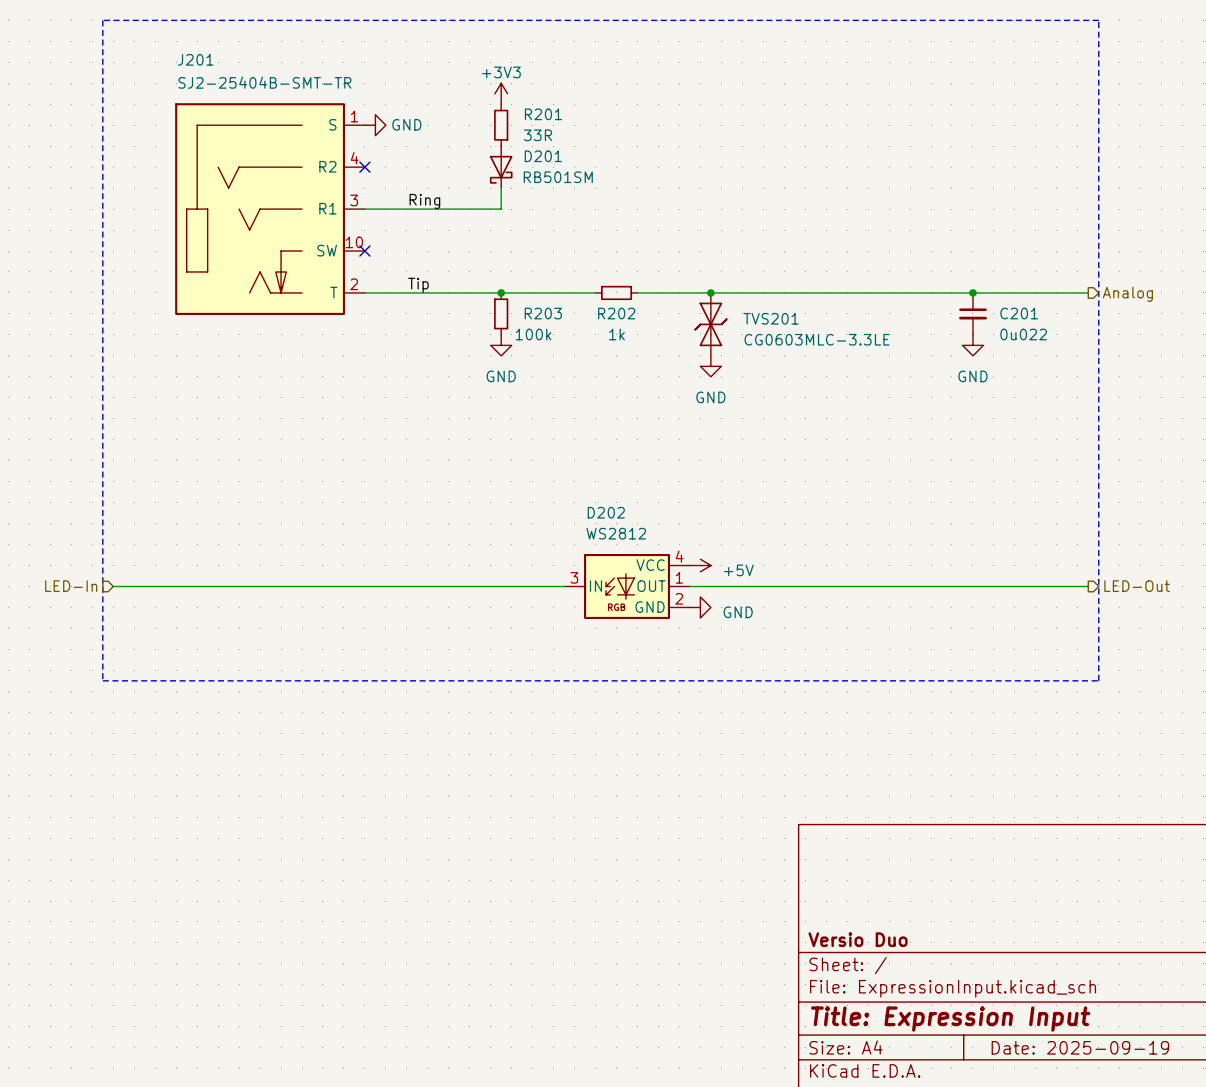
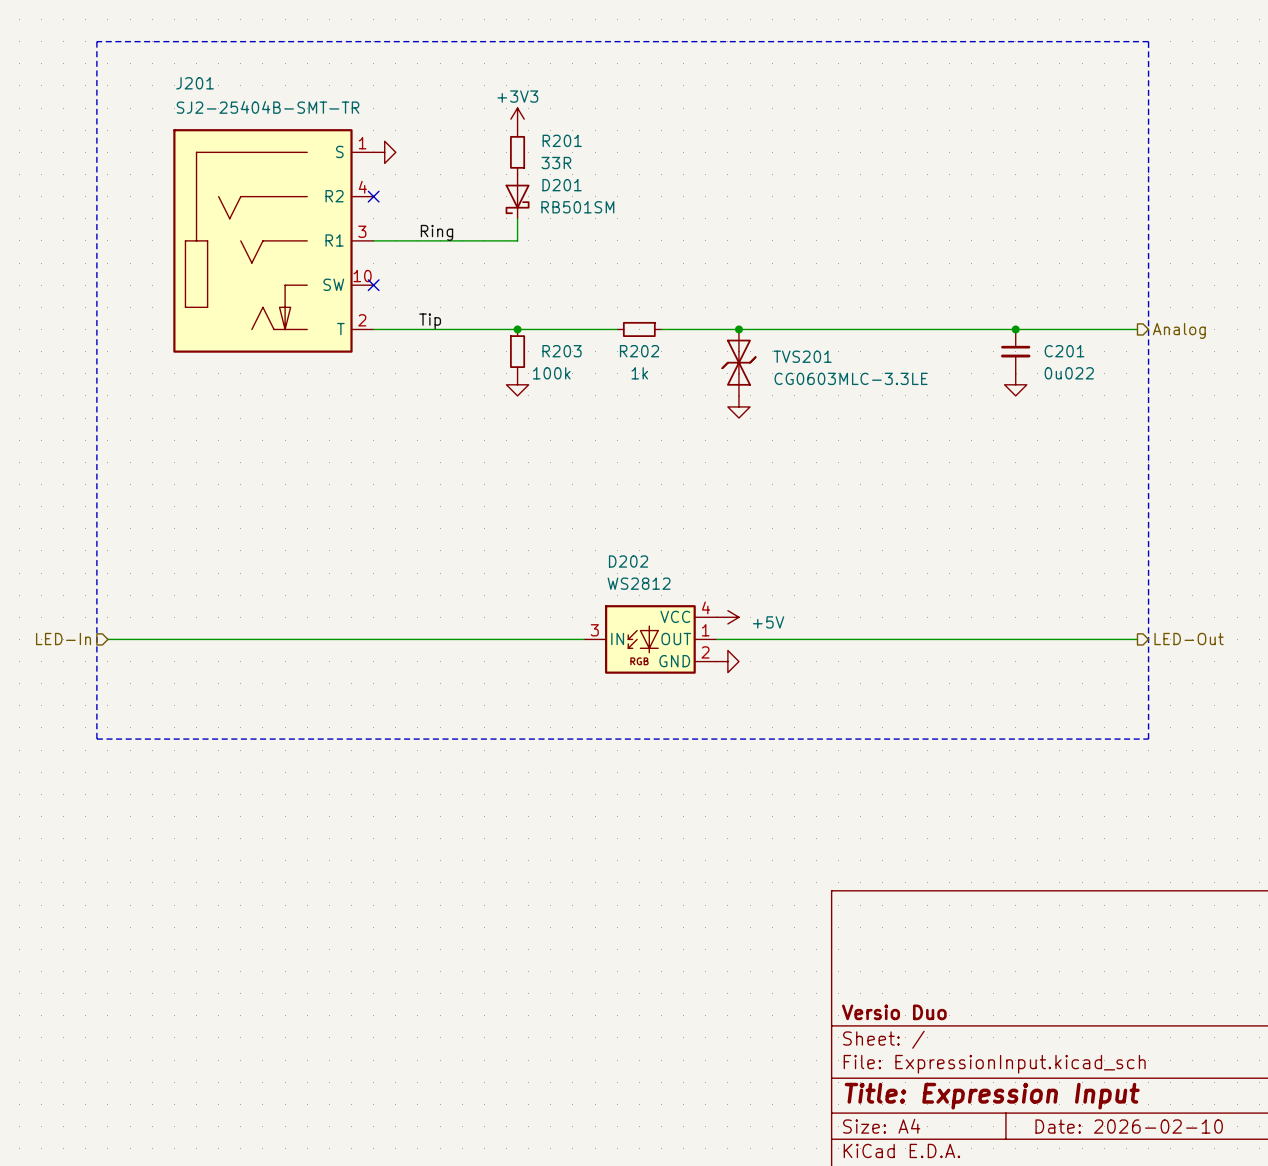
power symbol text: GND (406, 124) -> none
power symbol text: GND (501, 376) -> none
power symbol text: GND (972, 376) -> none
power symbol text: GND (710, 397) -> none
power symbol text: GND (738, 612) -> none
title block: Date: 2025-09-19 (1080, 1047) -> Date: 2026-02-10 (1129, 1126)

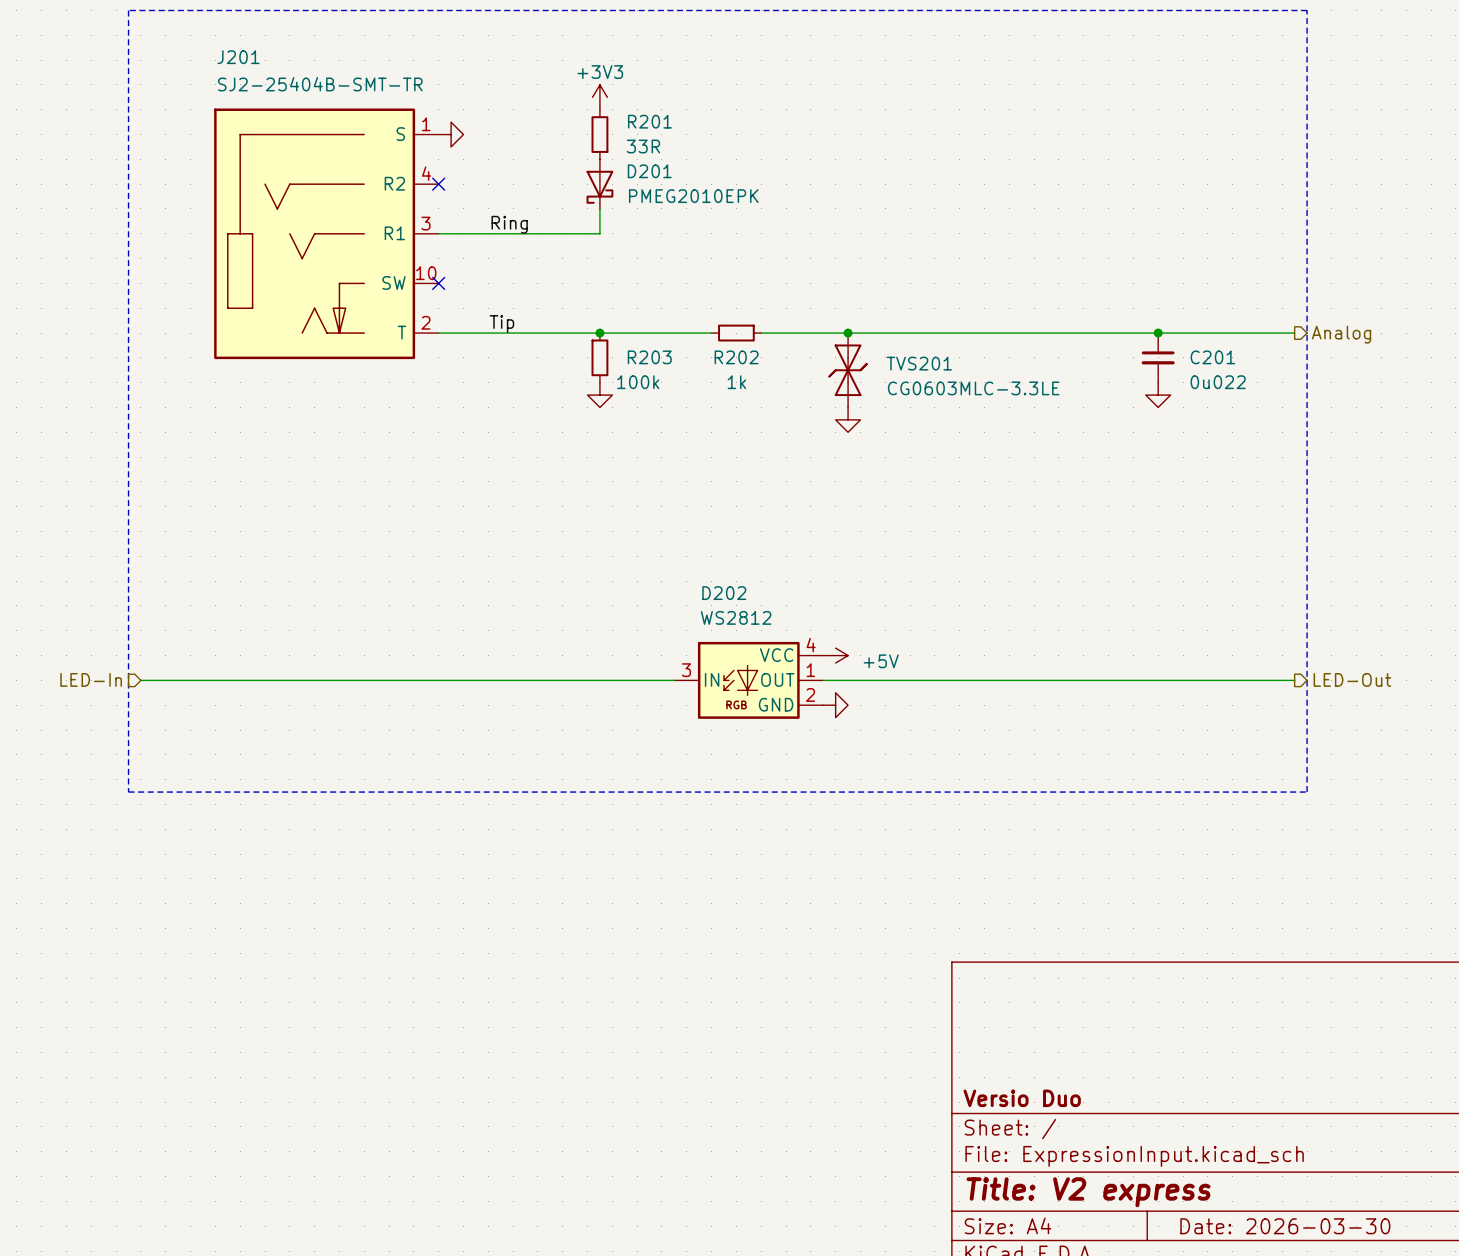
D201 value: RB501SM (577, 207) -> PMEG2010EPK (693, 196)
title block: Title: Expression Input (992, 1096) -> Title: V2 express (1088, 1192)
title block: Date: 2026-02-10 (1129, 1126) -> Date: 2026-03-30 (1285, 1226)

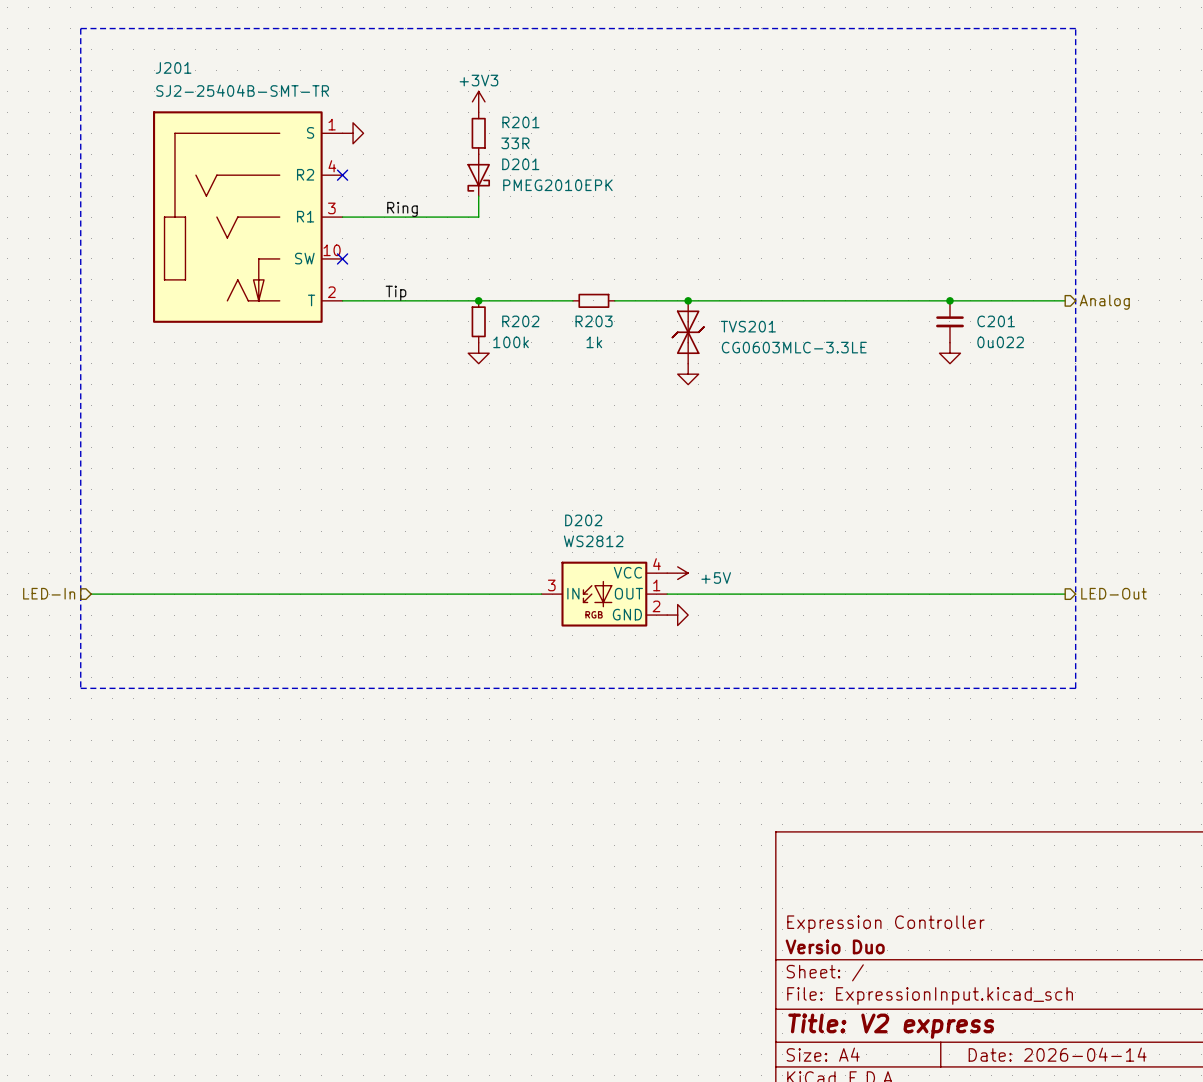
R203 name: R203 (649, 357) -> R202 (520, 321)
R202 name: R202 (736, 357) -> R203 (594, 321)
title block: none -> Expression Controller (885, 924)
title block: Date: 2026-03-30 (1285, 1226) -> Date: 2026-04-14 (1057, 1054)

